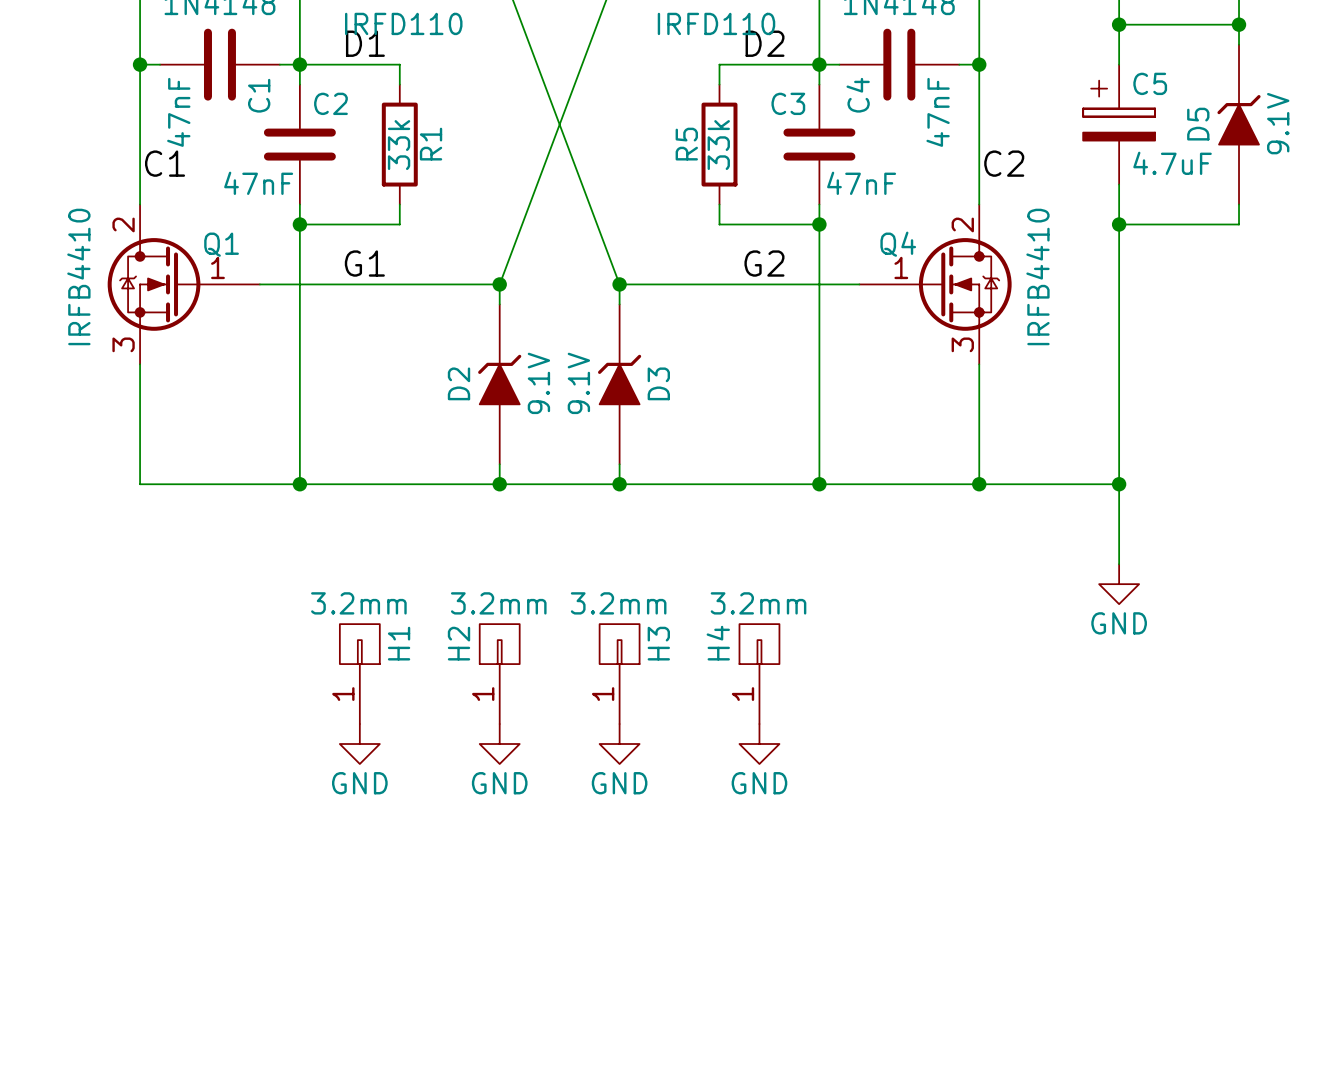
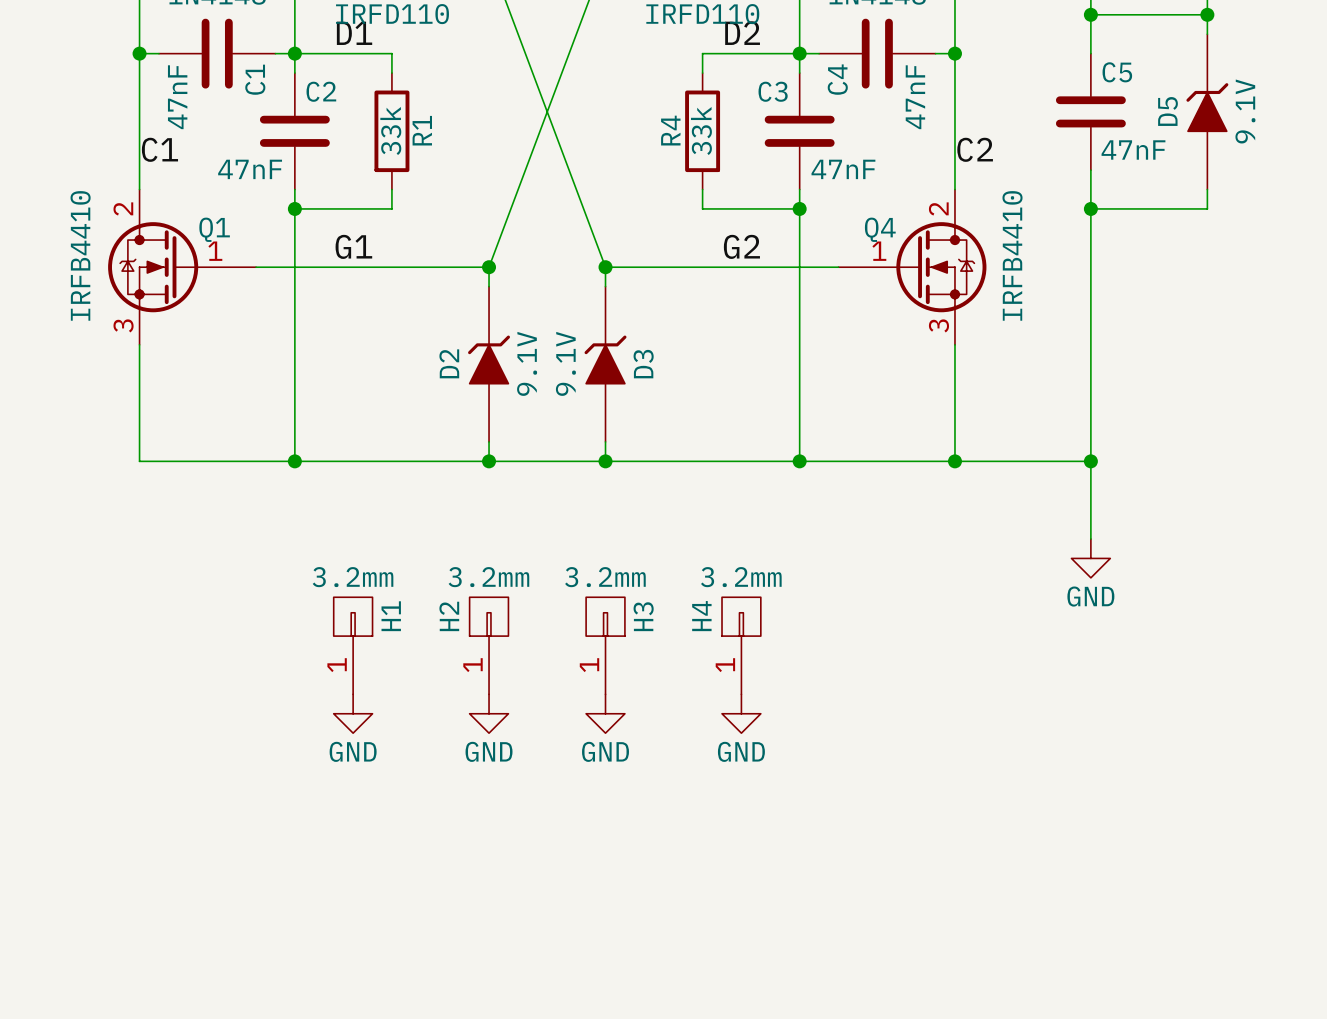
C5 symbol: [1083, 64, 1156, 185] -> [1055, 53, 1126, 171]
R5 name: R5 (686, 144) -> R4 (670, 130)
C5 value: 4.7uF (1172, 163) -> 47nF (1133, 149)

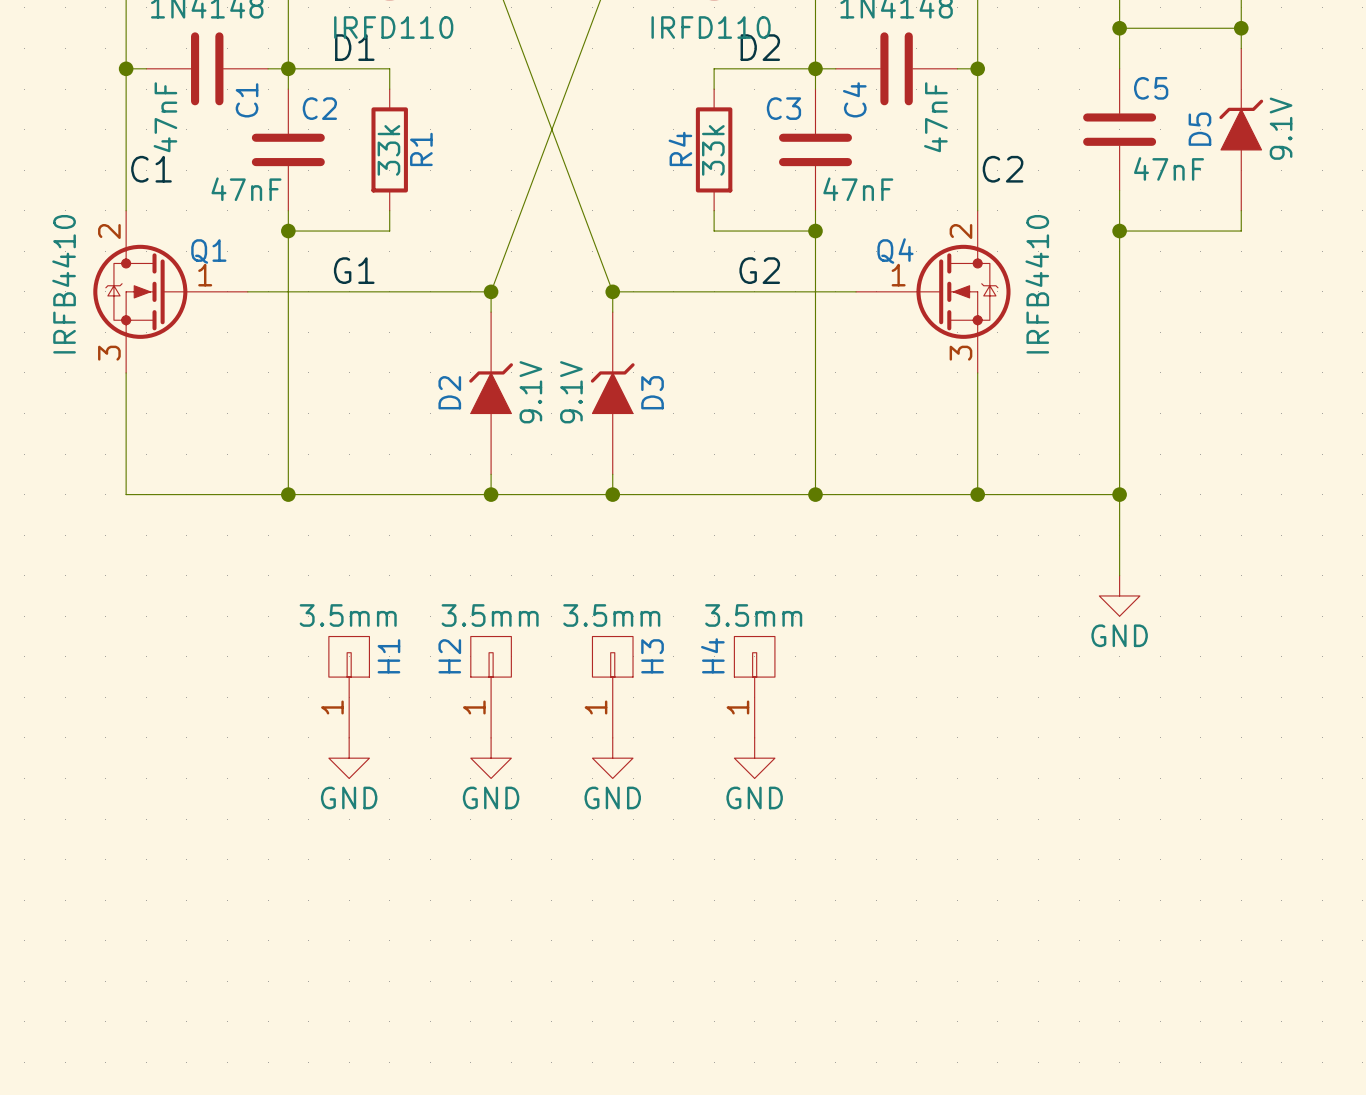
H1 value: 3.2mm (353, 577) -> 3.5mm (348, 615)
H2 value: 3.2mm (488, 577) -> 3.5mm (490, 615)
H3 value: 3.2mm (605, 577) -> 3.5mm (611, 615)
H4 value: 3.2mm (741, 577) -> 3.5mm (753, 615)

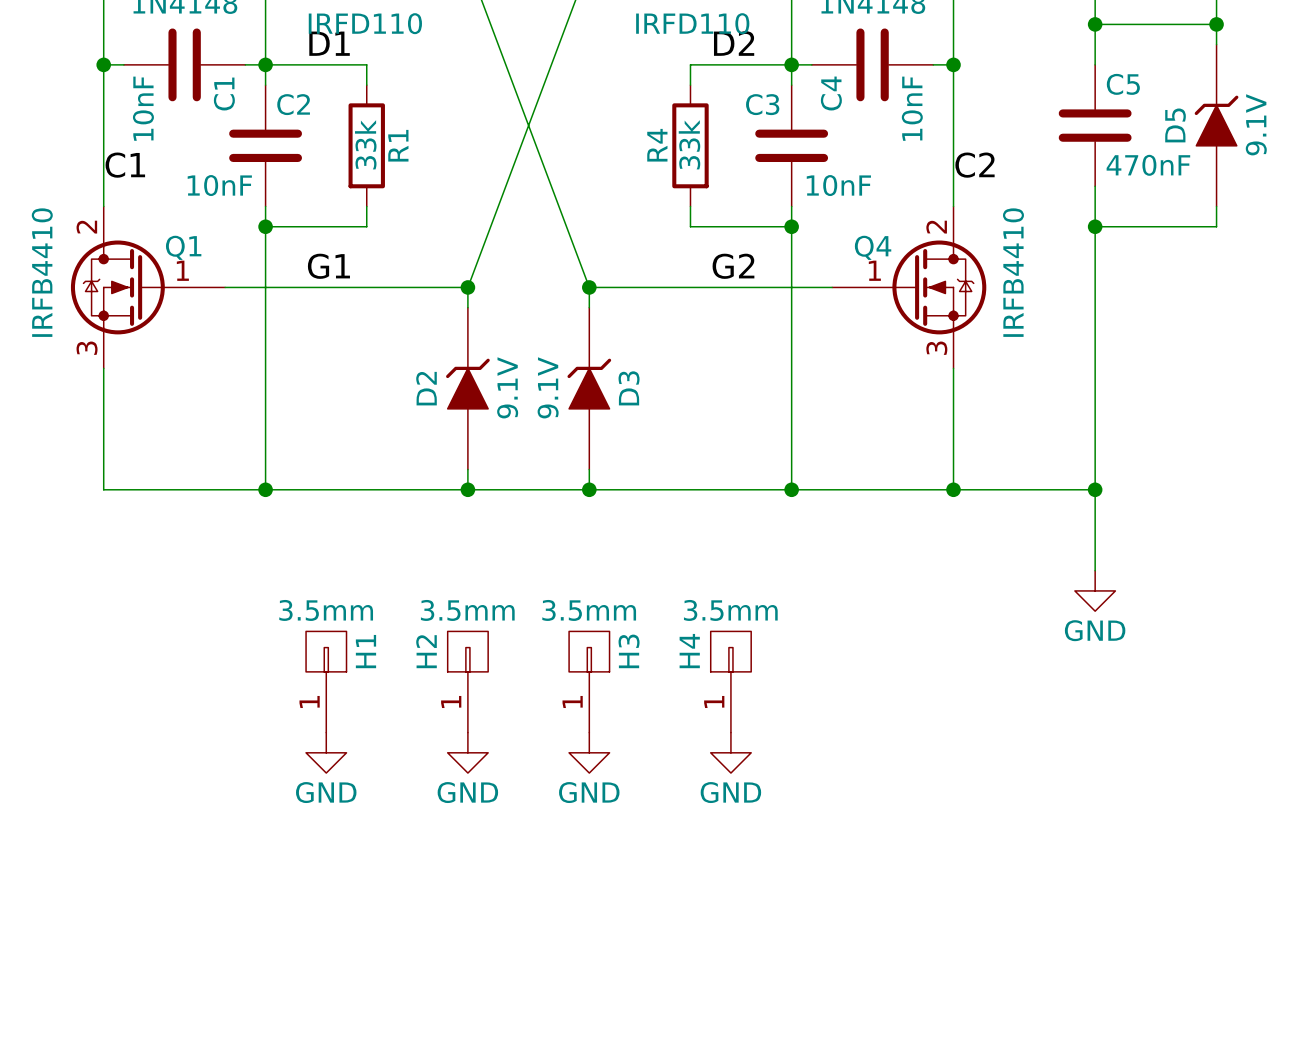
C1 value: 47nF (165, 117) -> 10nF (143, 108)
C4 value: 47nF (935, 117) -> 10nF (912, 108)
C5 value: 47nF (1169, 168) -> 470nF (1148, 165)
C2 value: 47nF (246, 189) -> 10nF (219, 185)
C3 value: 47nF (858, 189) -> 10nF (838, 185)

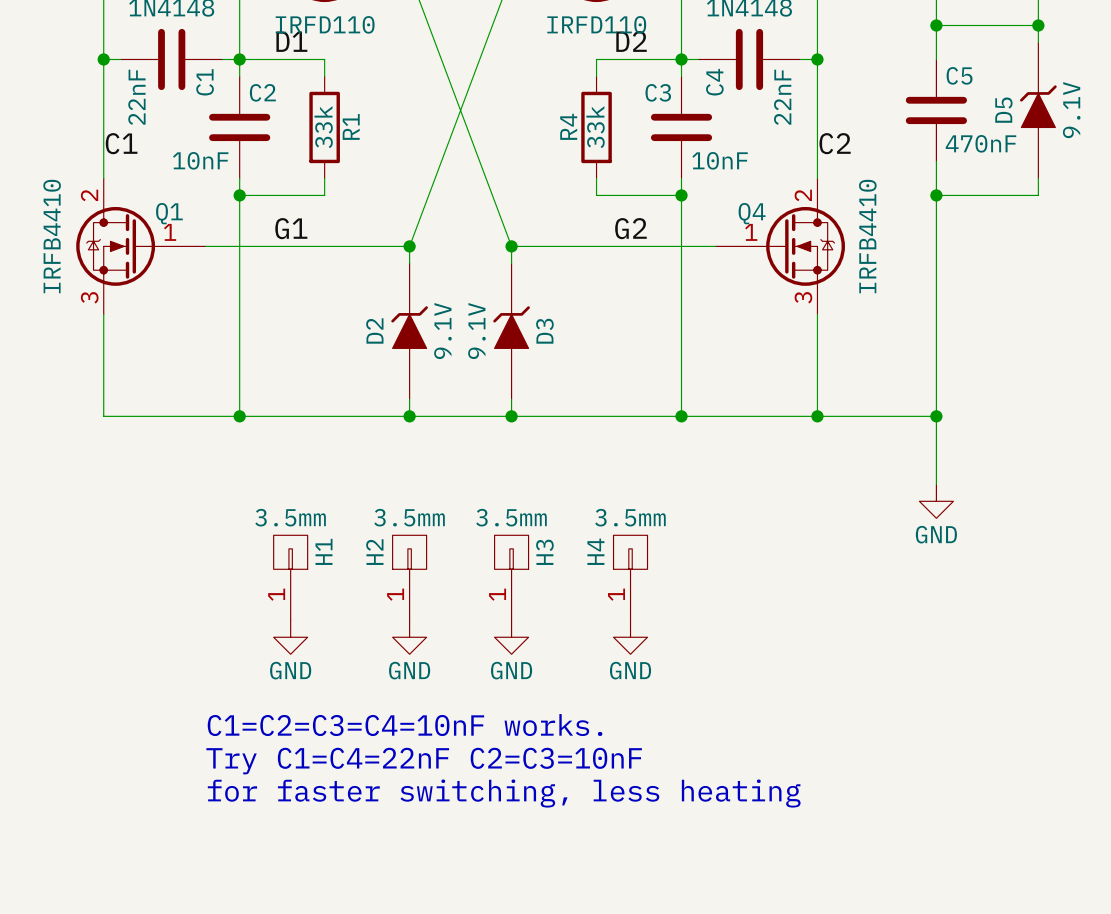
C1 value: 10nF (143, 108) -> 22nF (136, 97)
C4 value: 10nF (912, 108) -> 22nF (782, 97)
text: none -> C1=C2=C3=C4=10nF works. (405, 725)
text: none -> Try C1=C4=22nF C2=C3=10nF (424, 761)
text: none -> for faster switching, less heating (504, 793)

